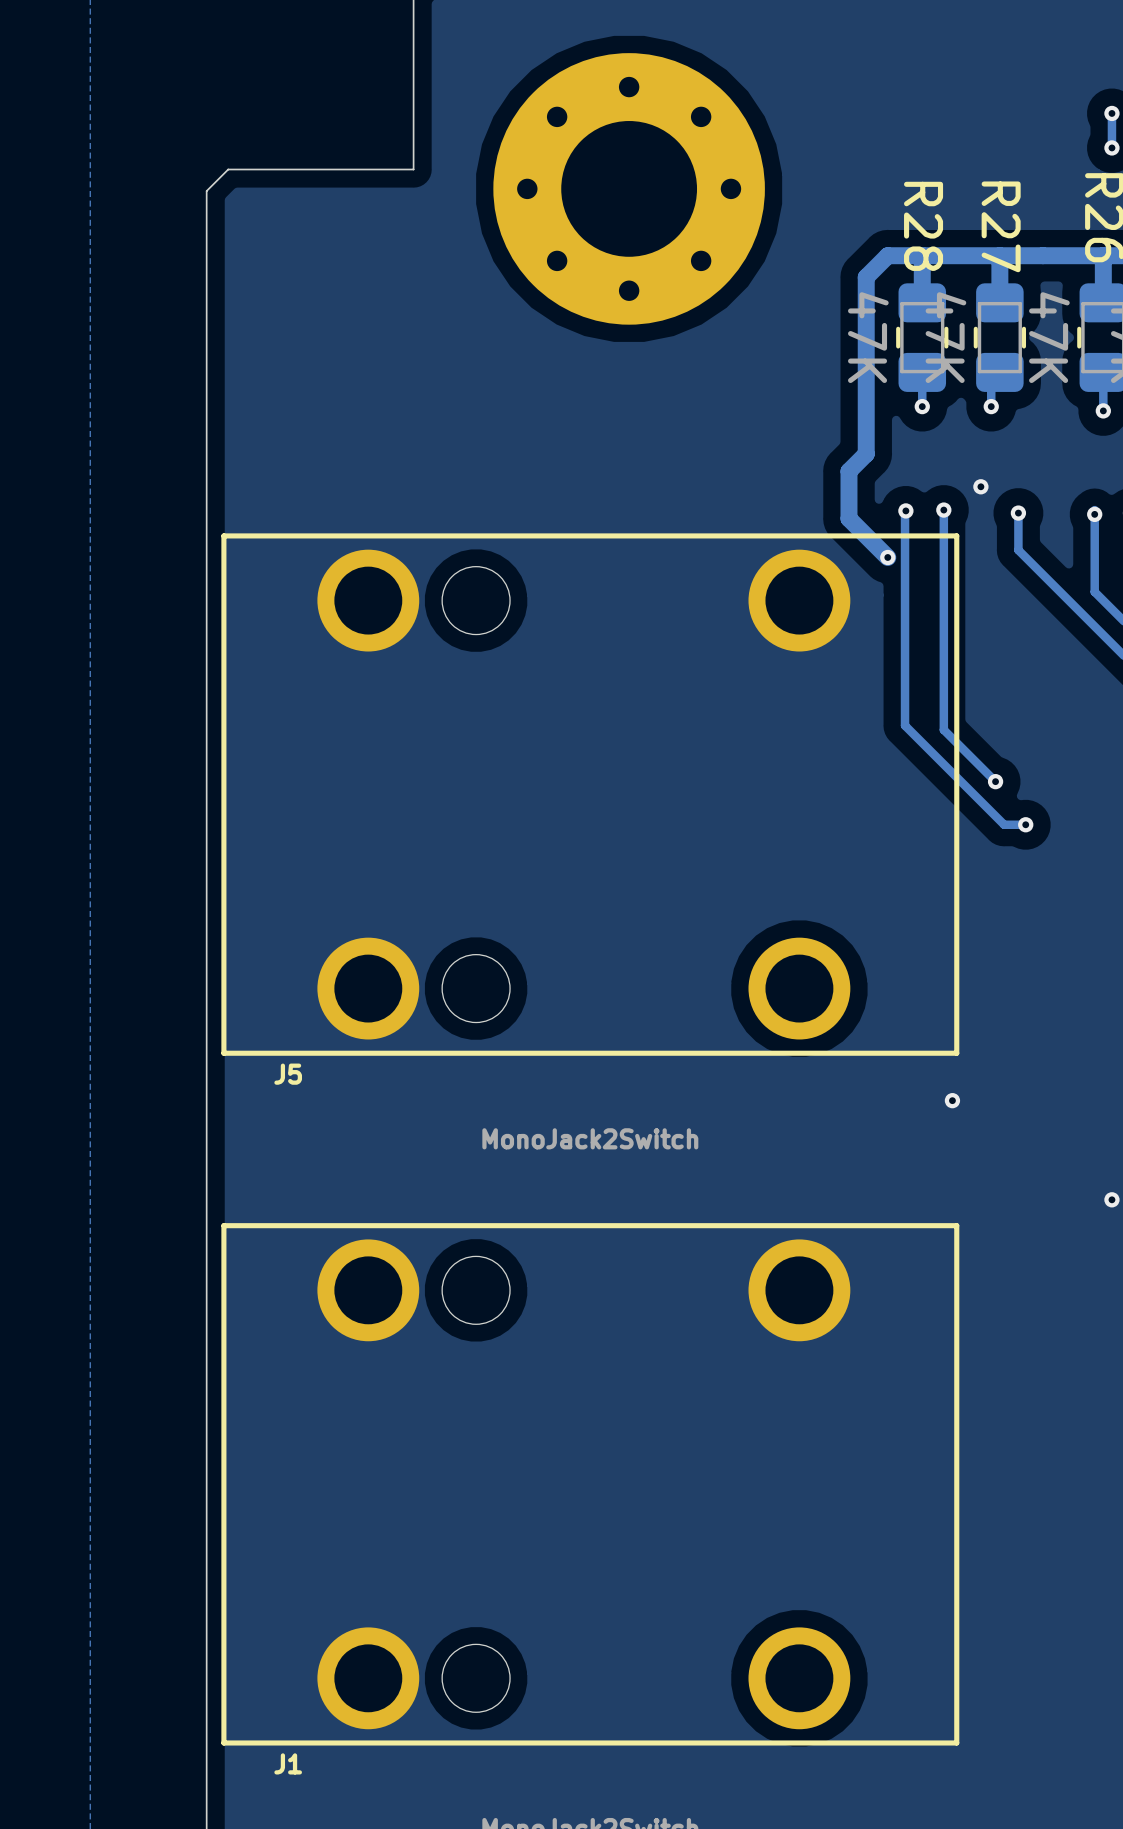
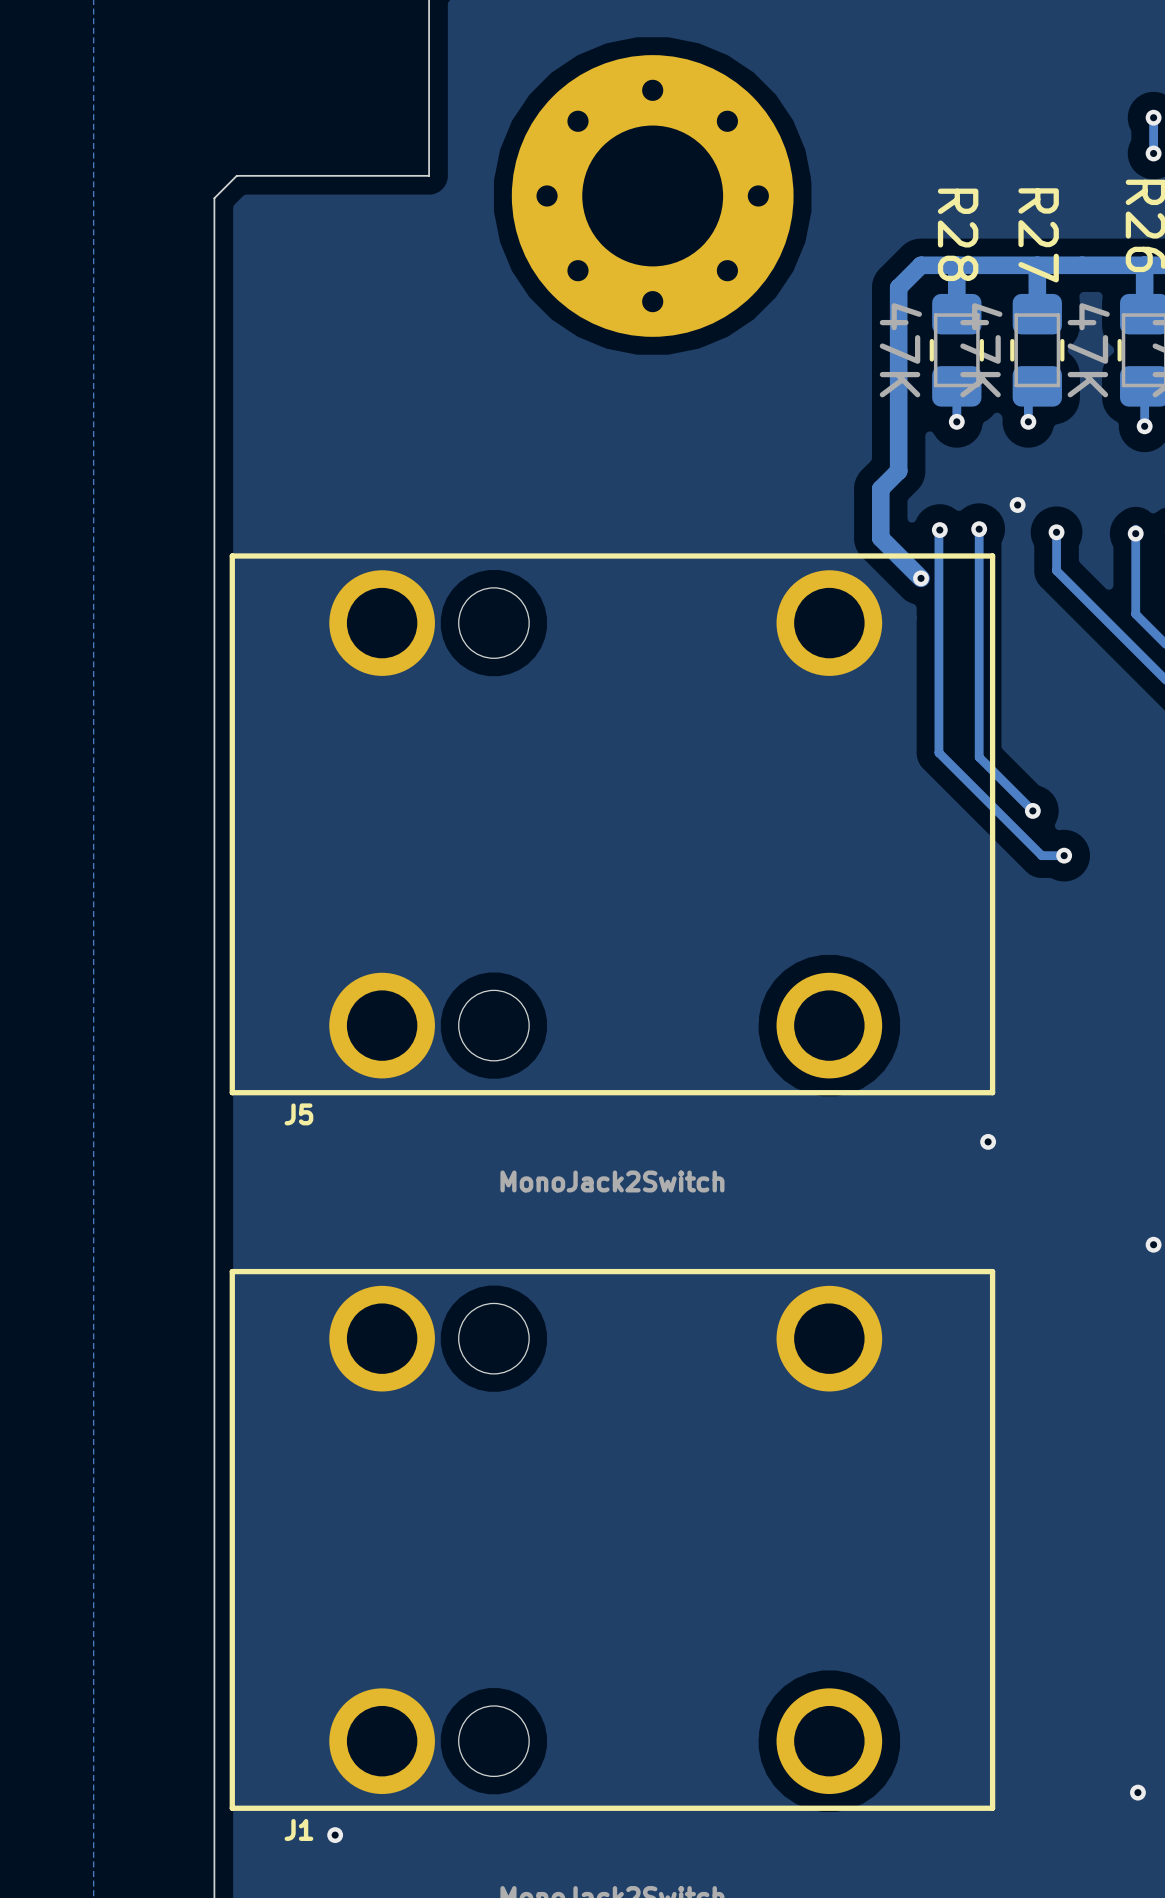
via: none -> (1137, 1792)
via: none -> (335, 1835)

